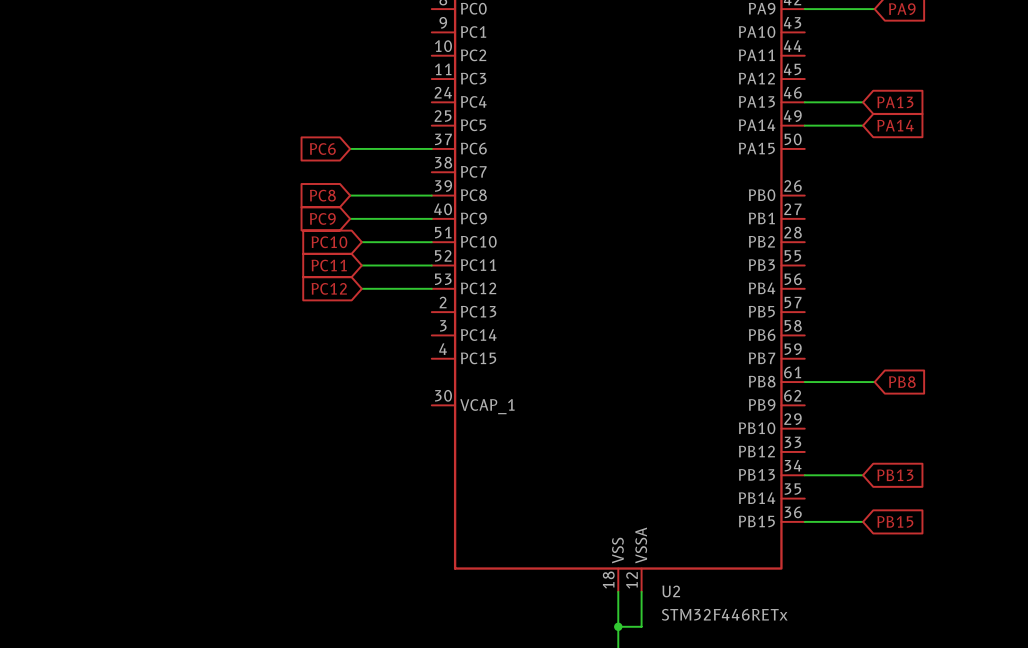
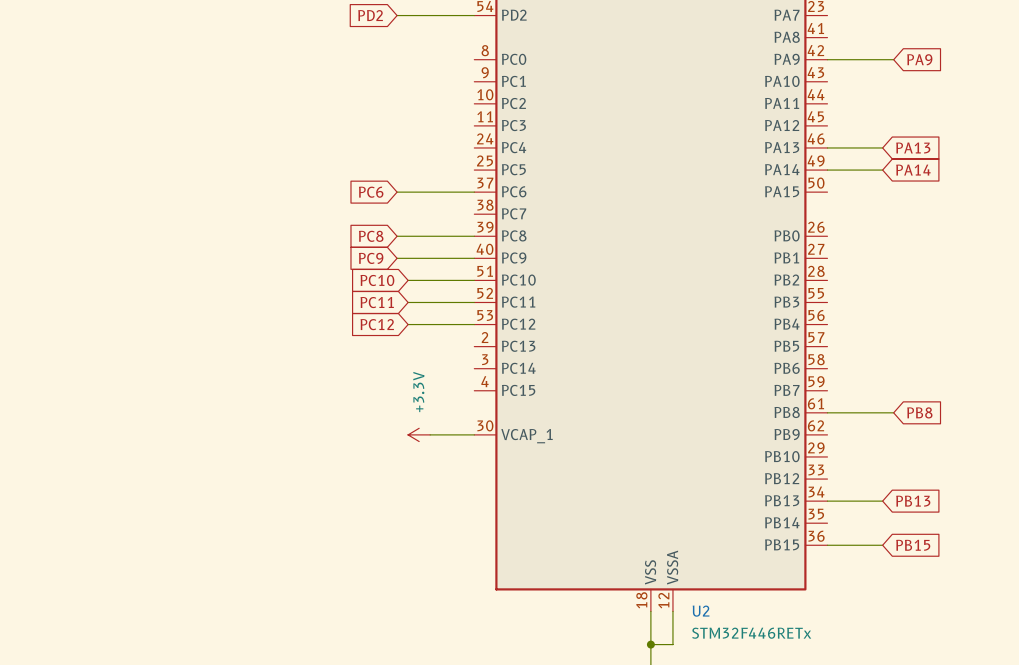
power symbol: none -> +3.3V (419, 434)
wire: none -> (430, 434) (474, 434)

